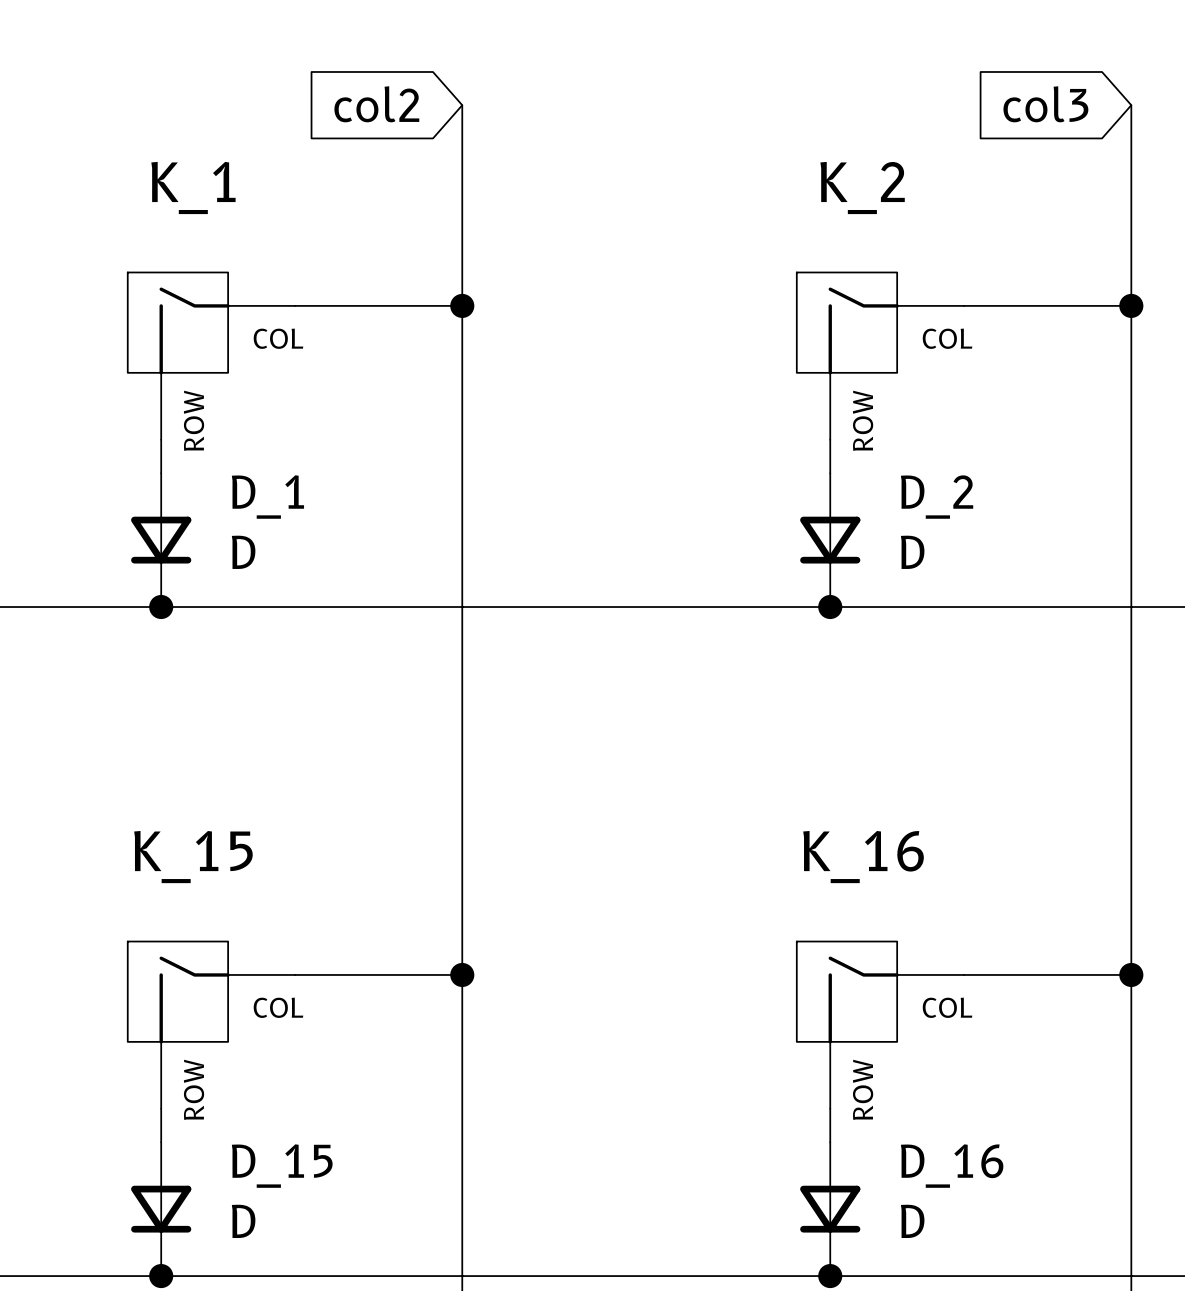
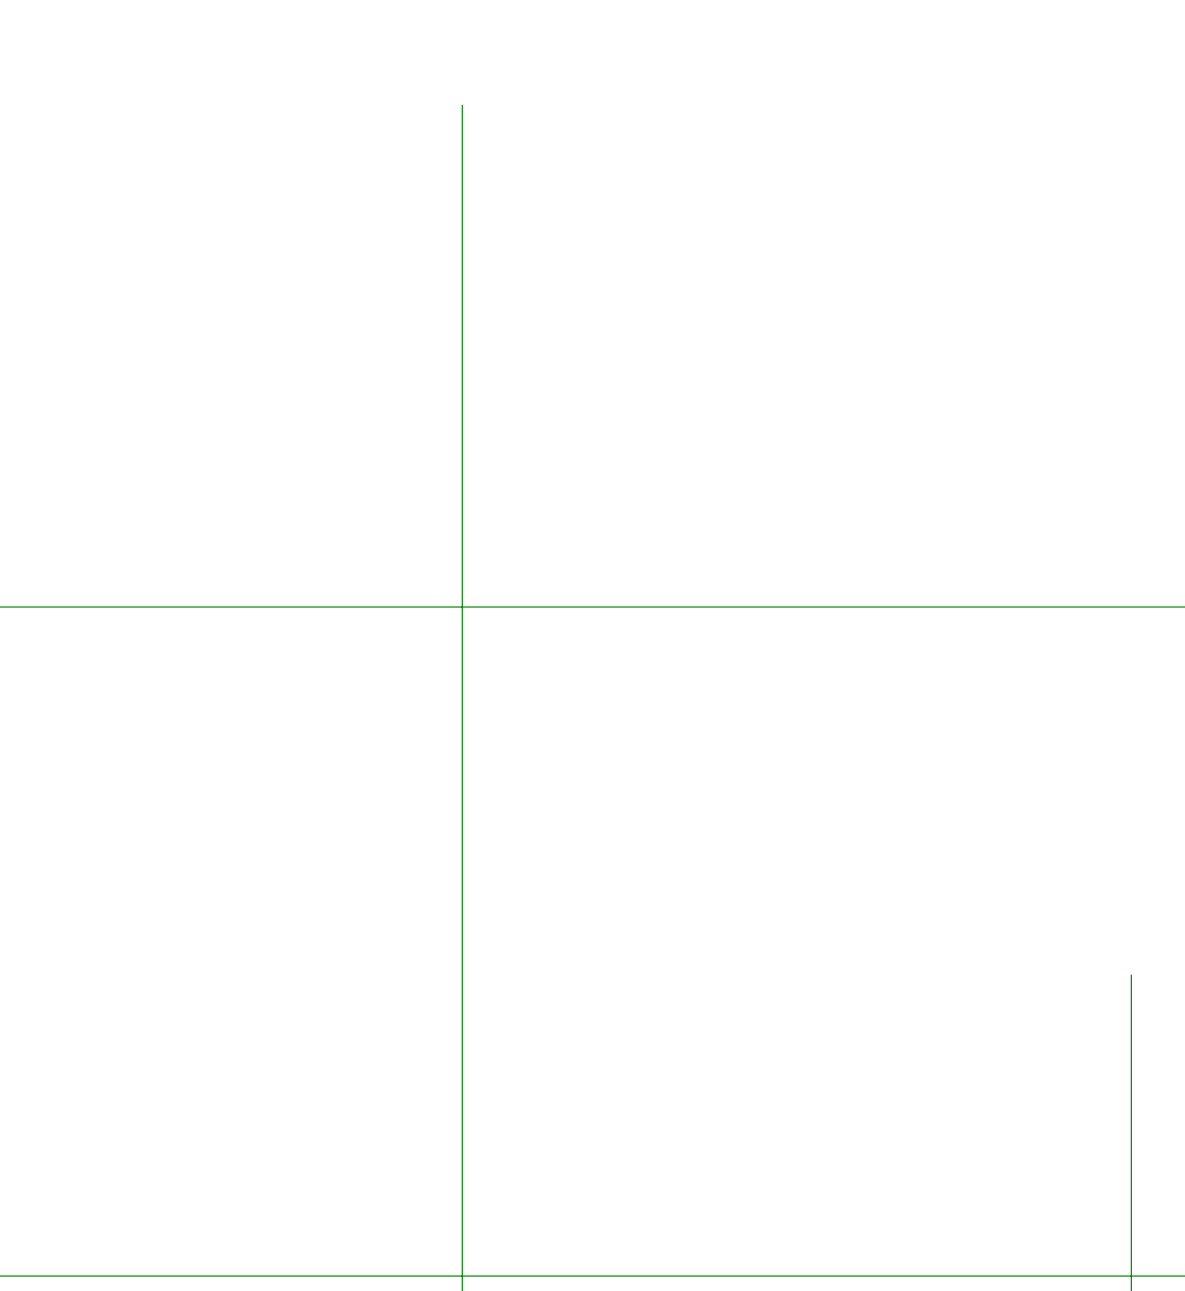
global label: col2 (376, 104) -> none
global label: col3 (1045, 104) -> none
wire: (1131, 105) (1131, 974) (964, 974) -> none
wire: (295, 305) (462, 305) -> none
junction: (462, 305) -> none
wire: (964, 305) (1131, 305) -> none
junction: (1131, 305) -> none
K_1: (211, 356) -> none
K_2: (880, 356) -> none
wire: (161, 439) (161, 473) -> none
wire: (830, 439) (830, 473) -> none
D_1: D (161, 540) -> none
D_2: D (830, 540) -> none
junction: (161, 607) -> none
junction: (830, 607) -> none
wire: (295, 974) (462, 974) -> none
junction: (462, 974) -> none
junction: (1131, 974) -> none
K_15: (211, 1025) -> none
K_16: (880, 1025) -> none
wire: (161, 1108) (161, 1142) -> none
wire: (830, 1108) (830, 1142) -> none
D_15: D (161, 1209) -> none
D_16: D (830, 1209) -> none
junction: (161, 1276) -> none
junction: (830, 1276) -> none

